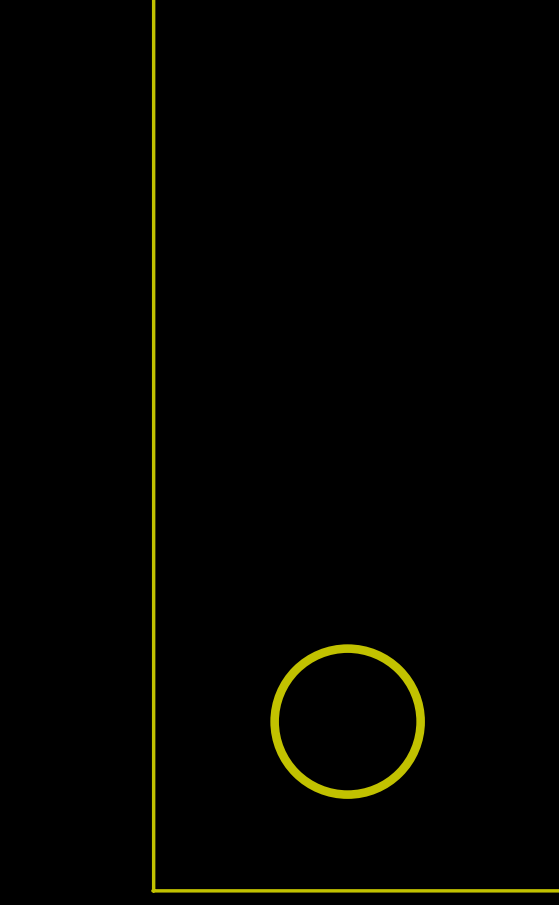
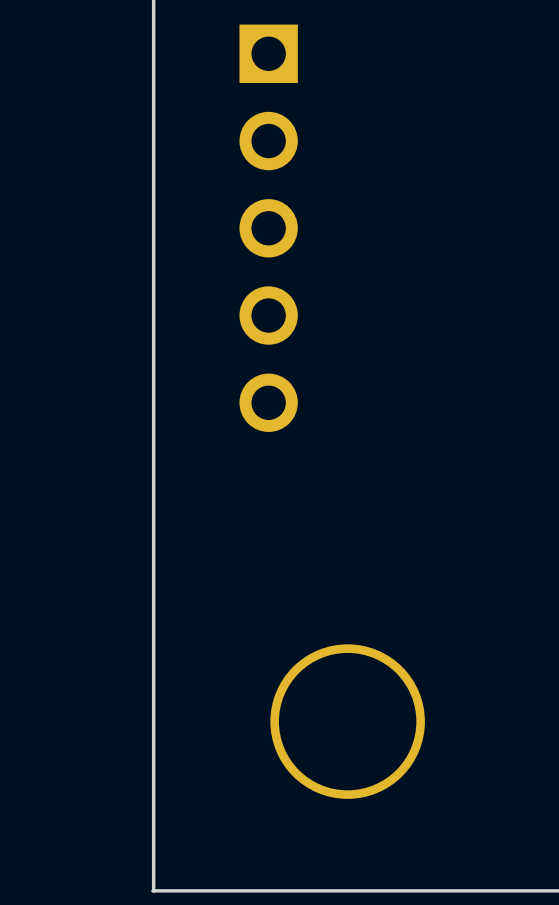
part: none -> (268, 228)

